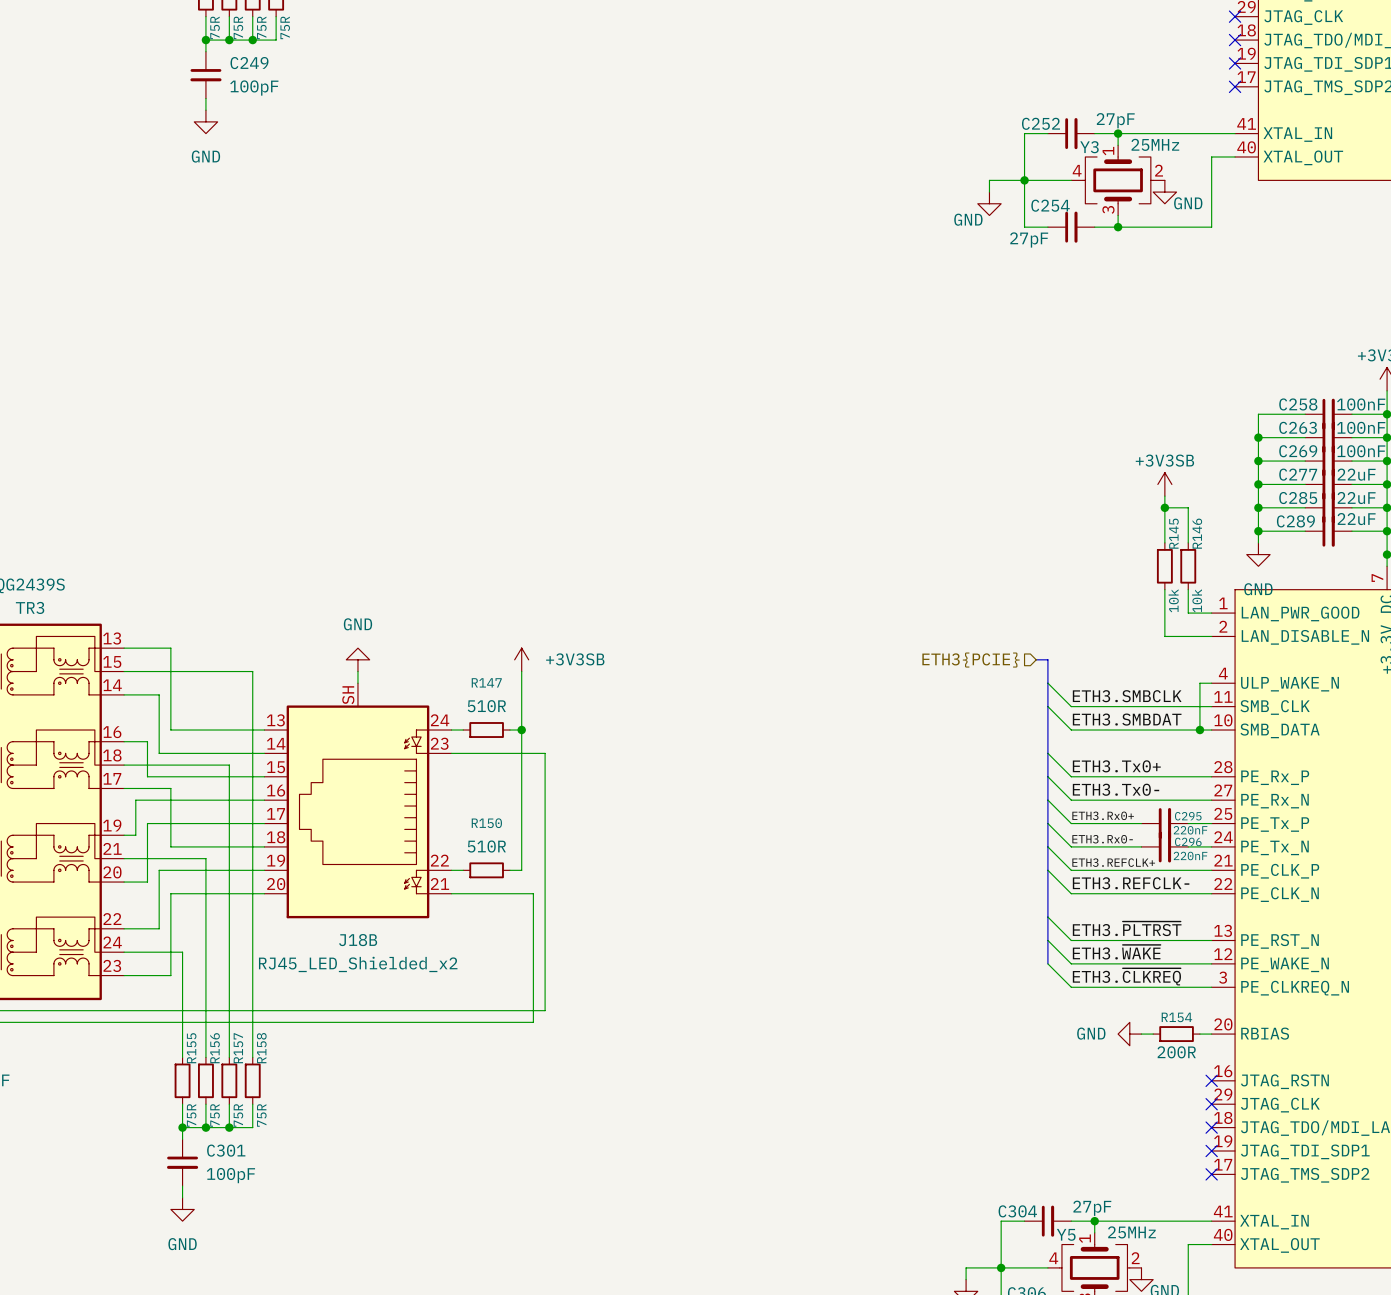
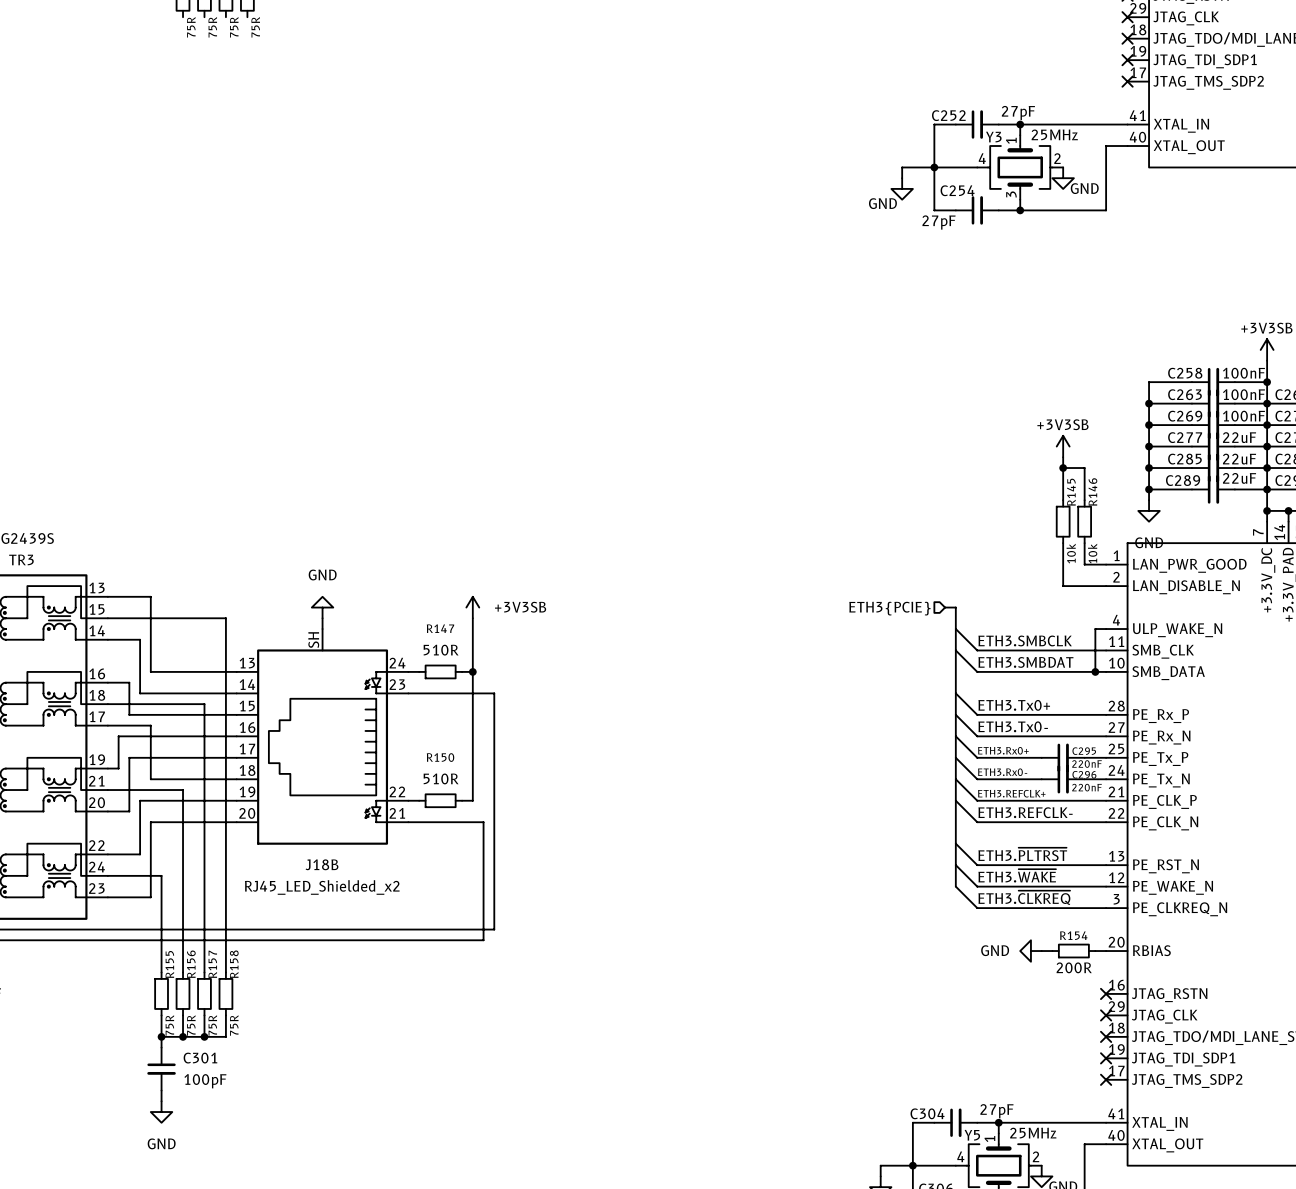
wire: (205, 16) (205, 51) -> none
wire: (229, 16) (229, 40) -> none
wire: (252, 16) (252, 40) -> none
wire: (276, 16) (276, 40) (205, 40) -> none
junction: (205, 40) -> none
junction: (229, 40) -> none
junction: (252, 40) -> none
C249: 100pF (205, 75) -> none
wire: (205, 98) (205, 110) -> none
power symbol: GND (205, 121) -> none

